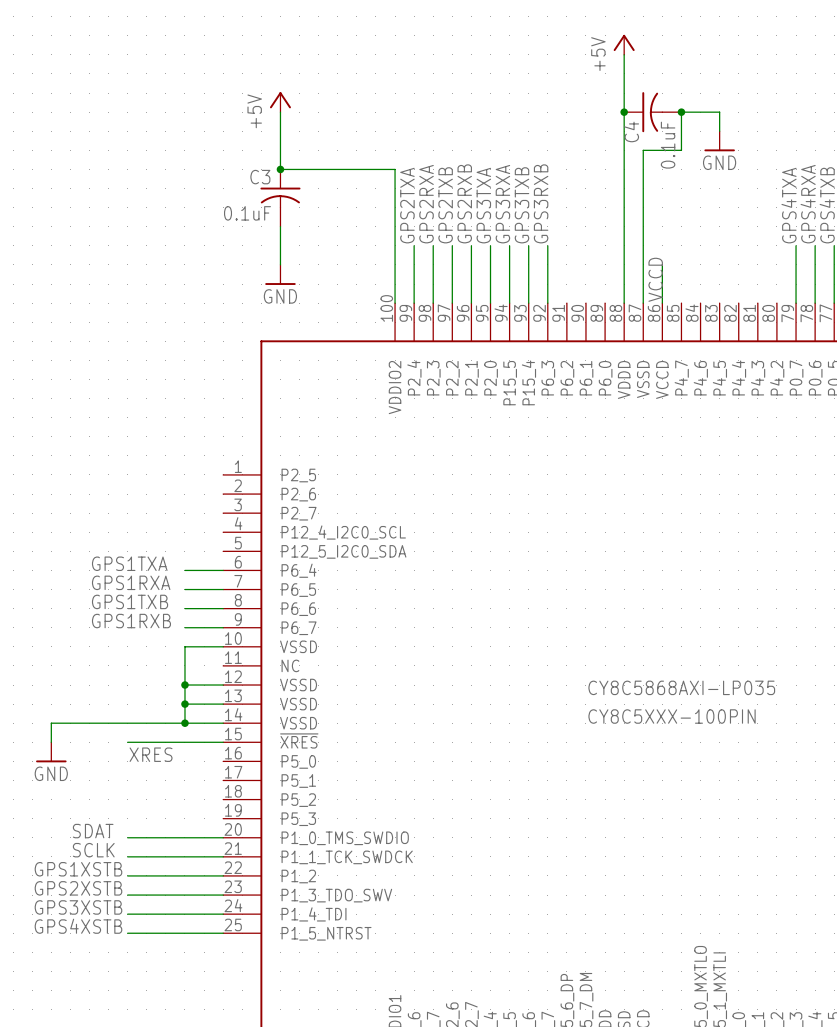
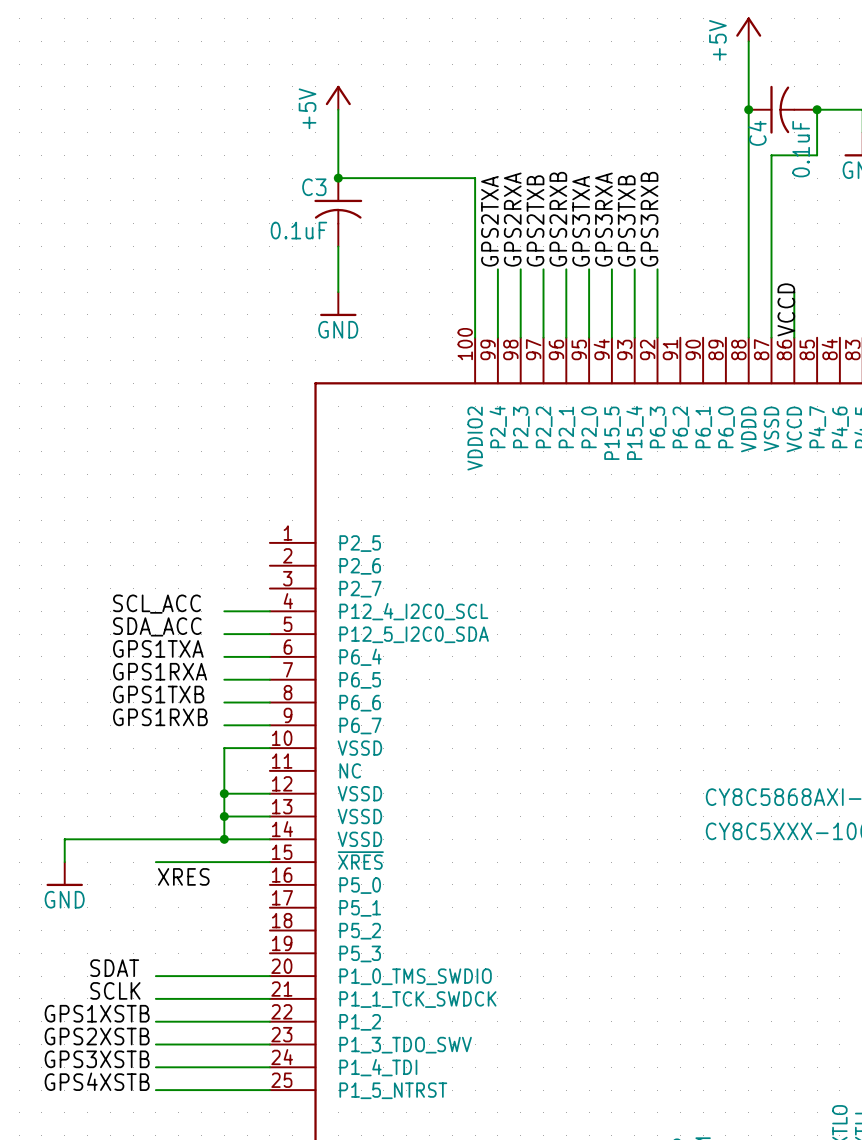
label: none -> SCL_ACC (156, 604)
wire: none -> (224, 611) (269, 611)
label: none -> SDA_ACC (157, 626)
wire: none -> (224, 634) (269, 634)

